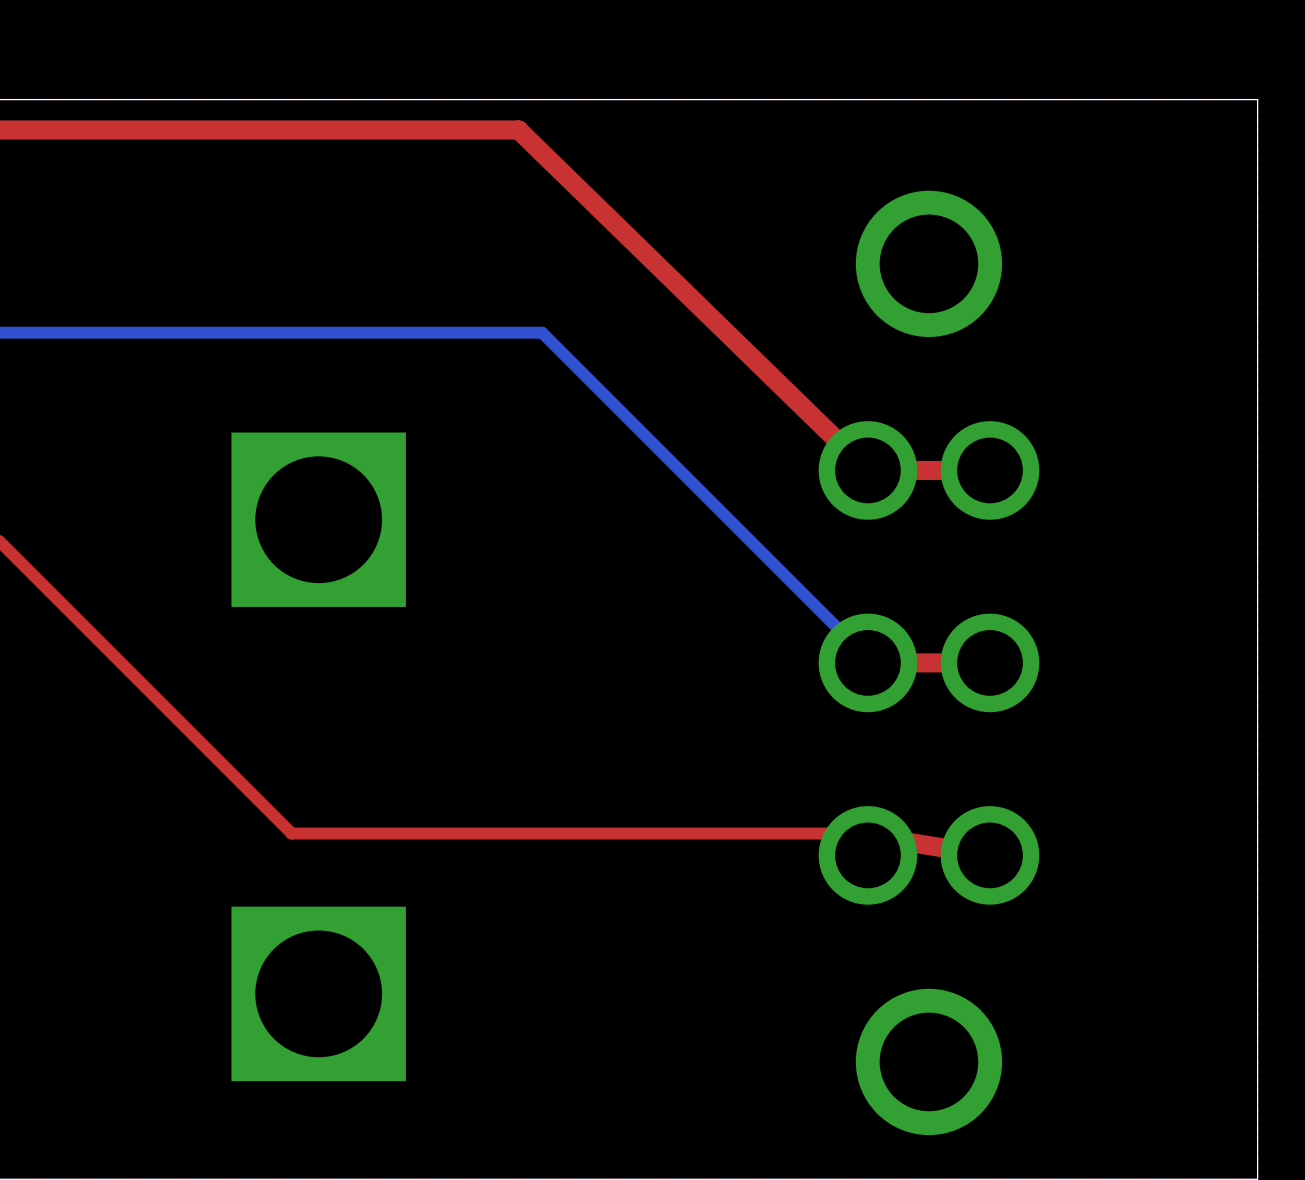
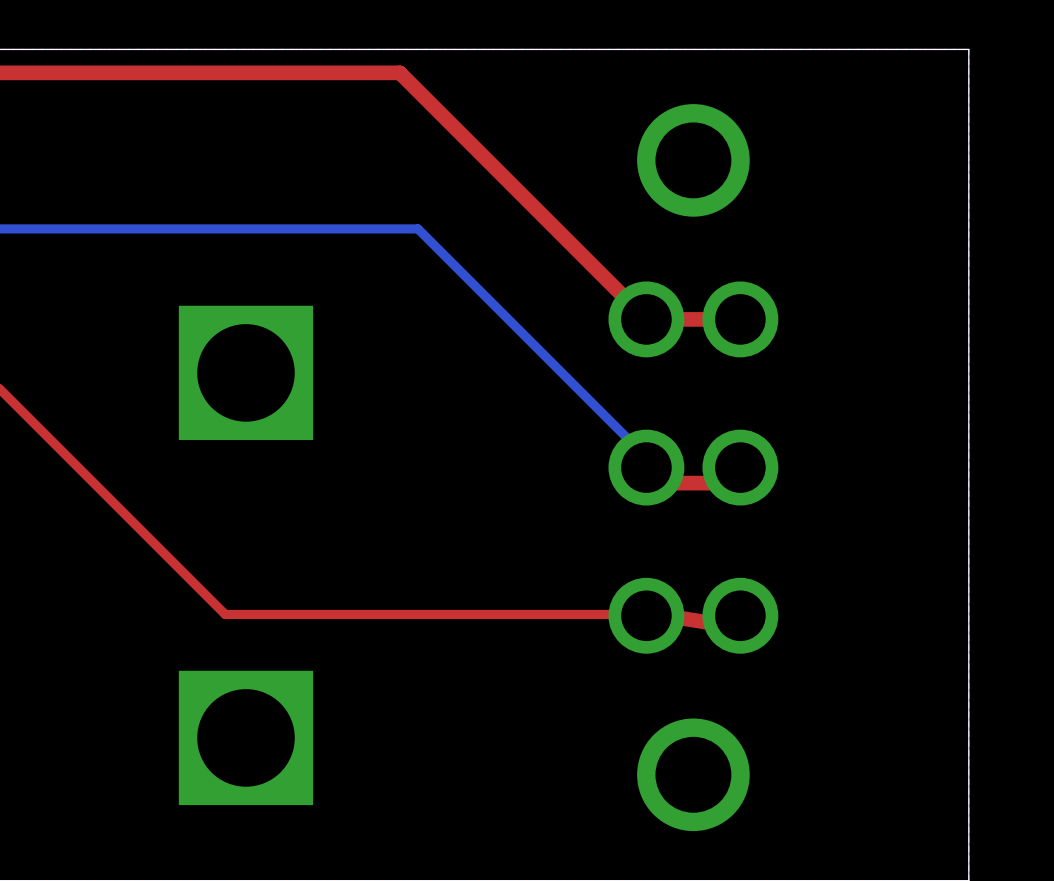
top track: (518, 129) (867, 470) (989, 470) -> (399, 72) (646, 319) (740, 319)
part position: (928, 662) -> (693, 467)

